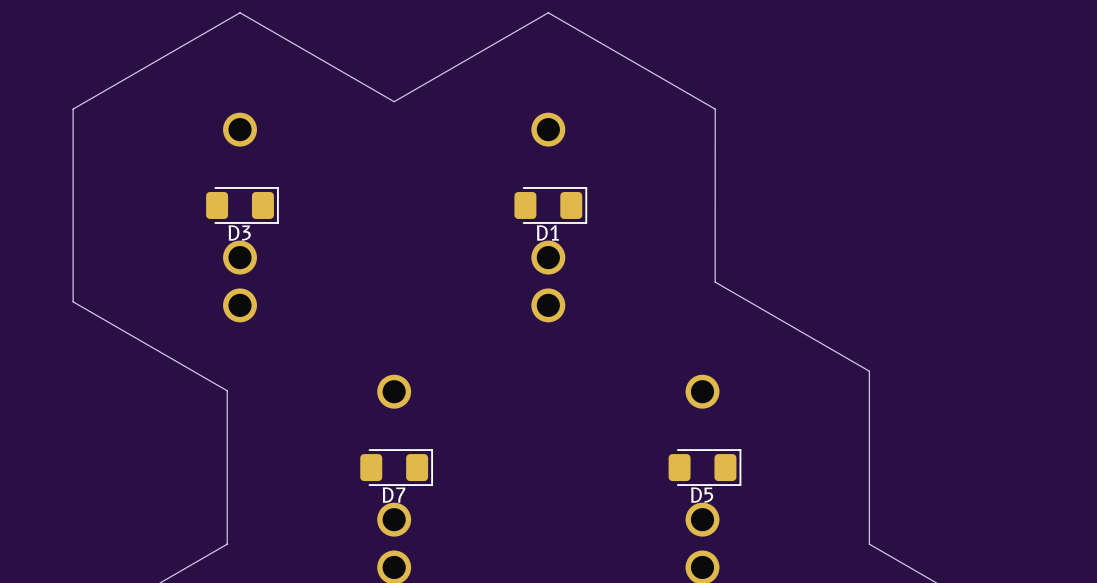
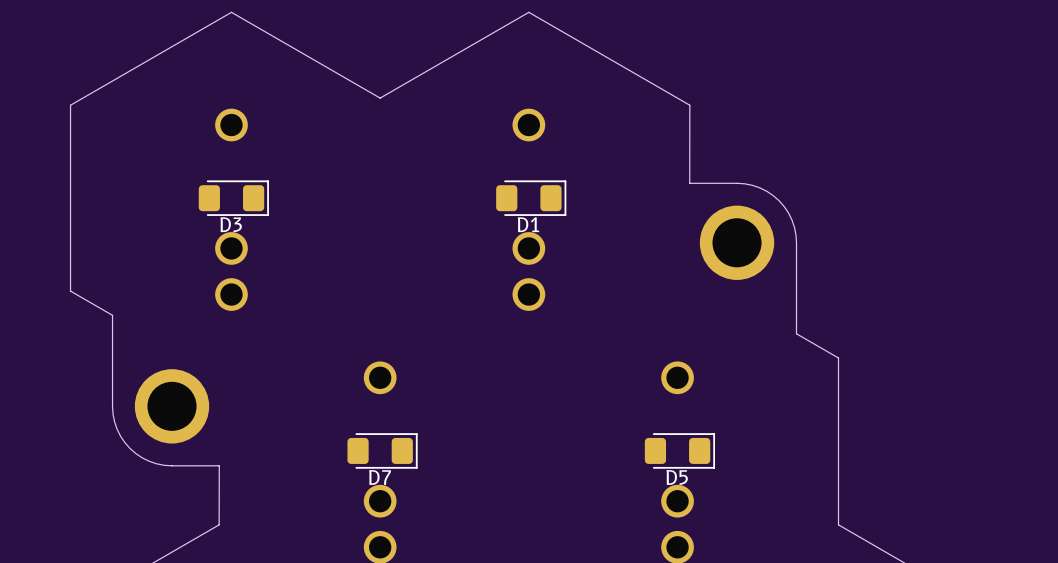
board edge: (715, 109) (715, 282) (869, 371) -> (689, 105) (689, 183) (737, 183) (752, 185) (773, 195) (784, 206) (791, 220) (795, 235) (796, 333) (838, 358)
part: none -> (737, 242)
board edge: (73, 301) (227, 390) (227, 544) -> (70, 291) (112, 315) (113, 414) (120, 436) (135, 453) (156, 463) (172, 465) (219, 465) (219, 524)
part: none -> (172, 406)

